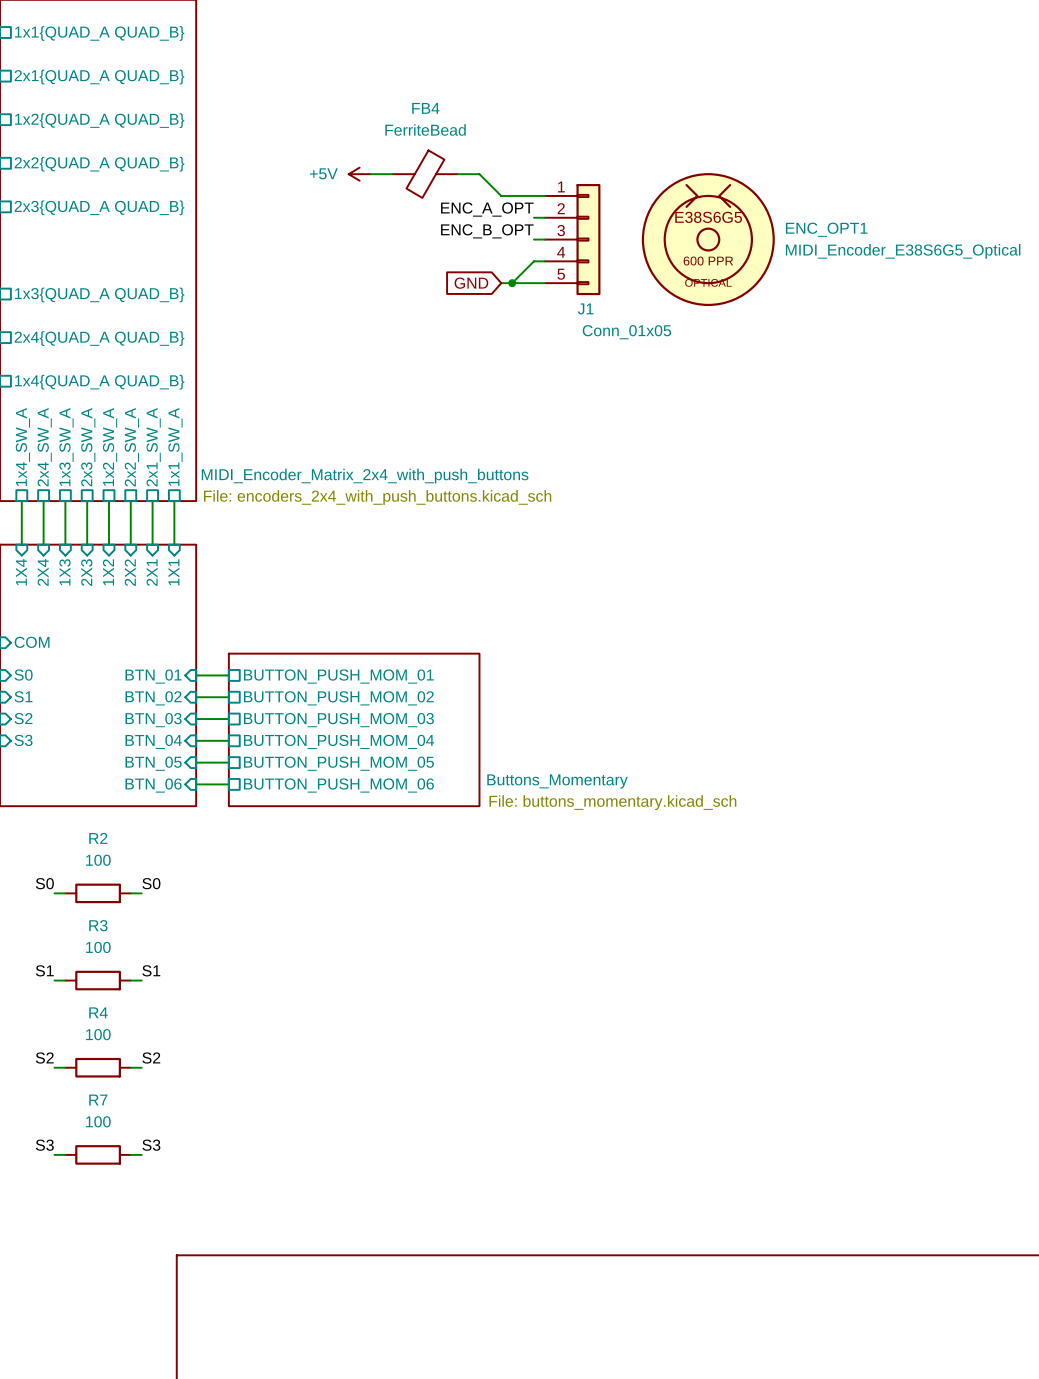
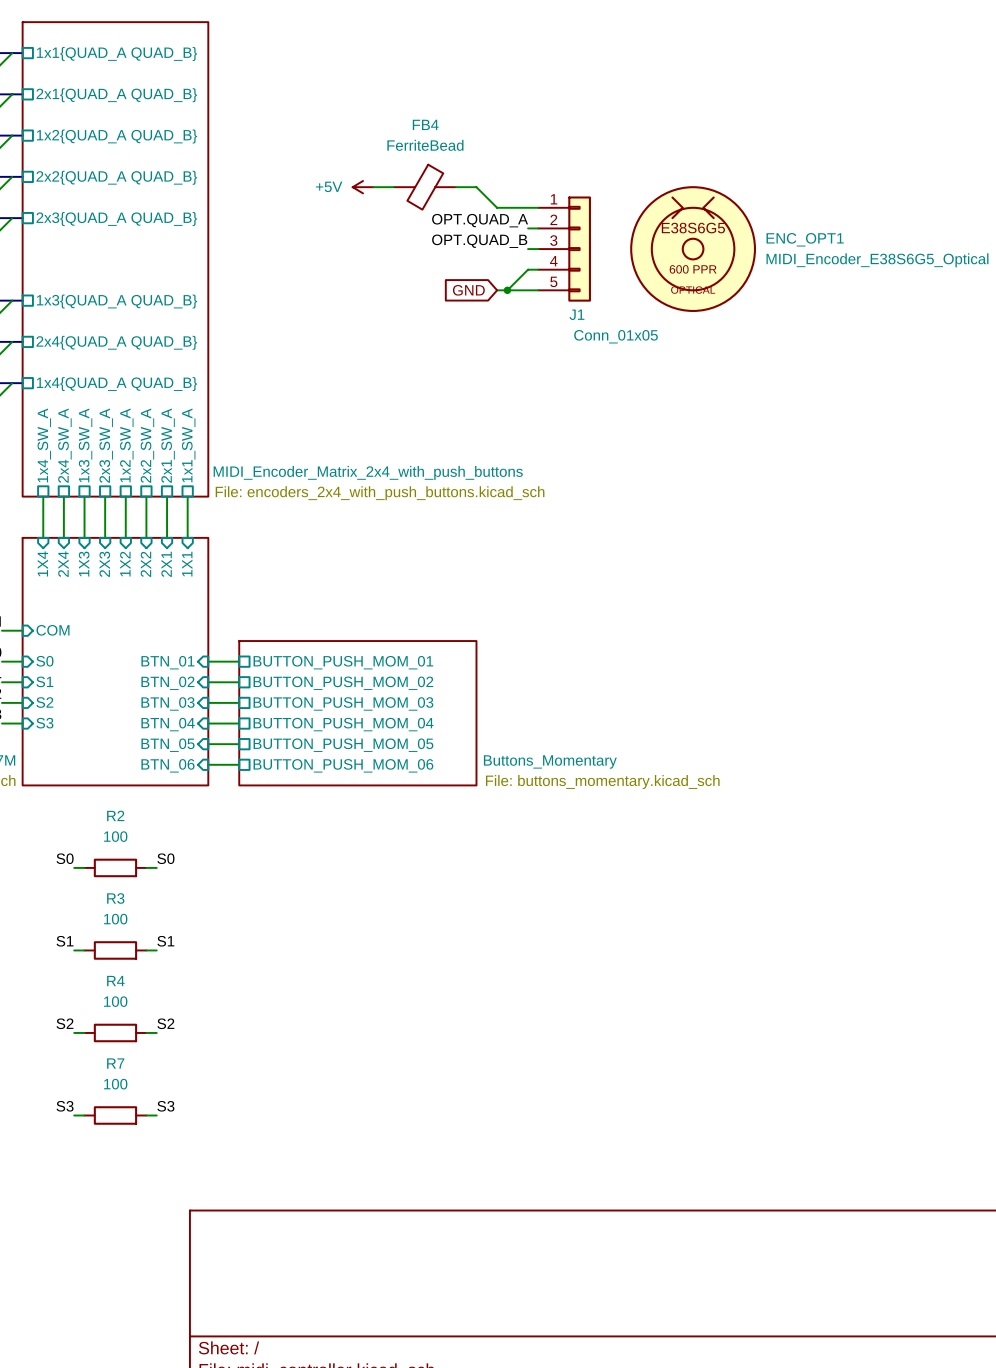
label: ENC_A_OPT (487, 209) -> OPT.QUAD_A (480, 220)
label: ENC_B_OPT (487, 231) -> OPT.QUAD_B (479, 241)

